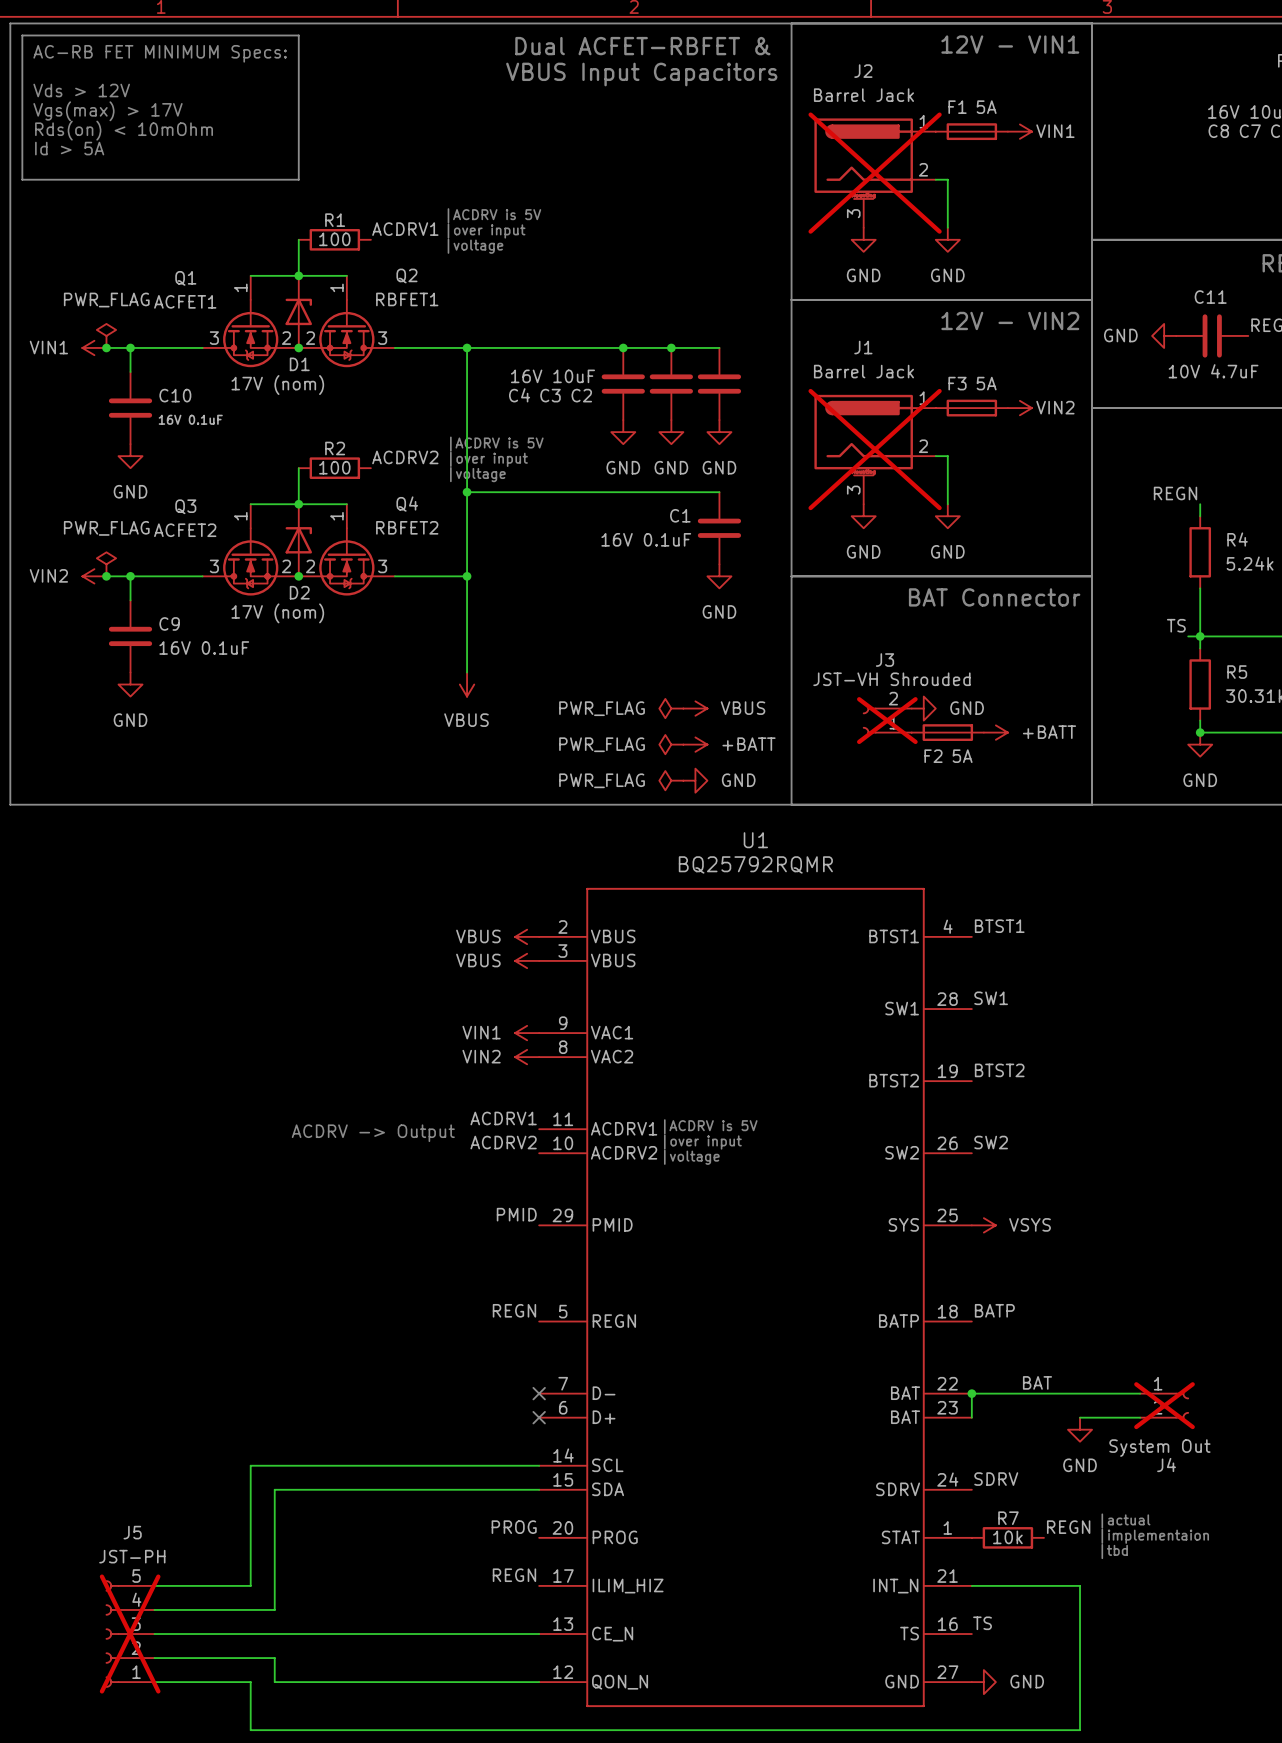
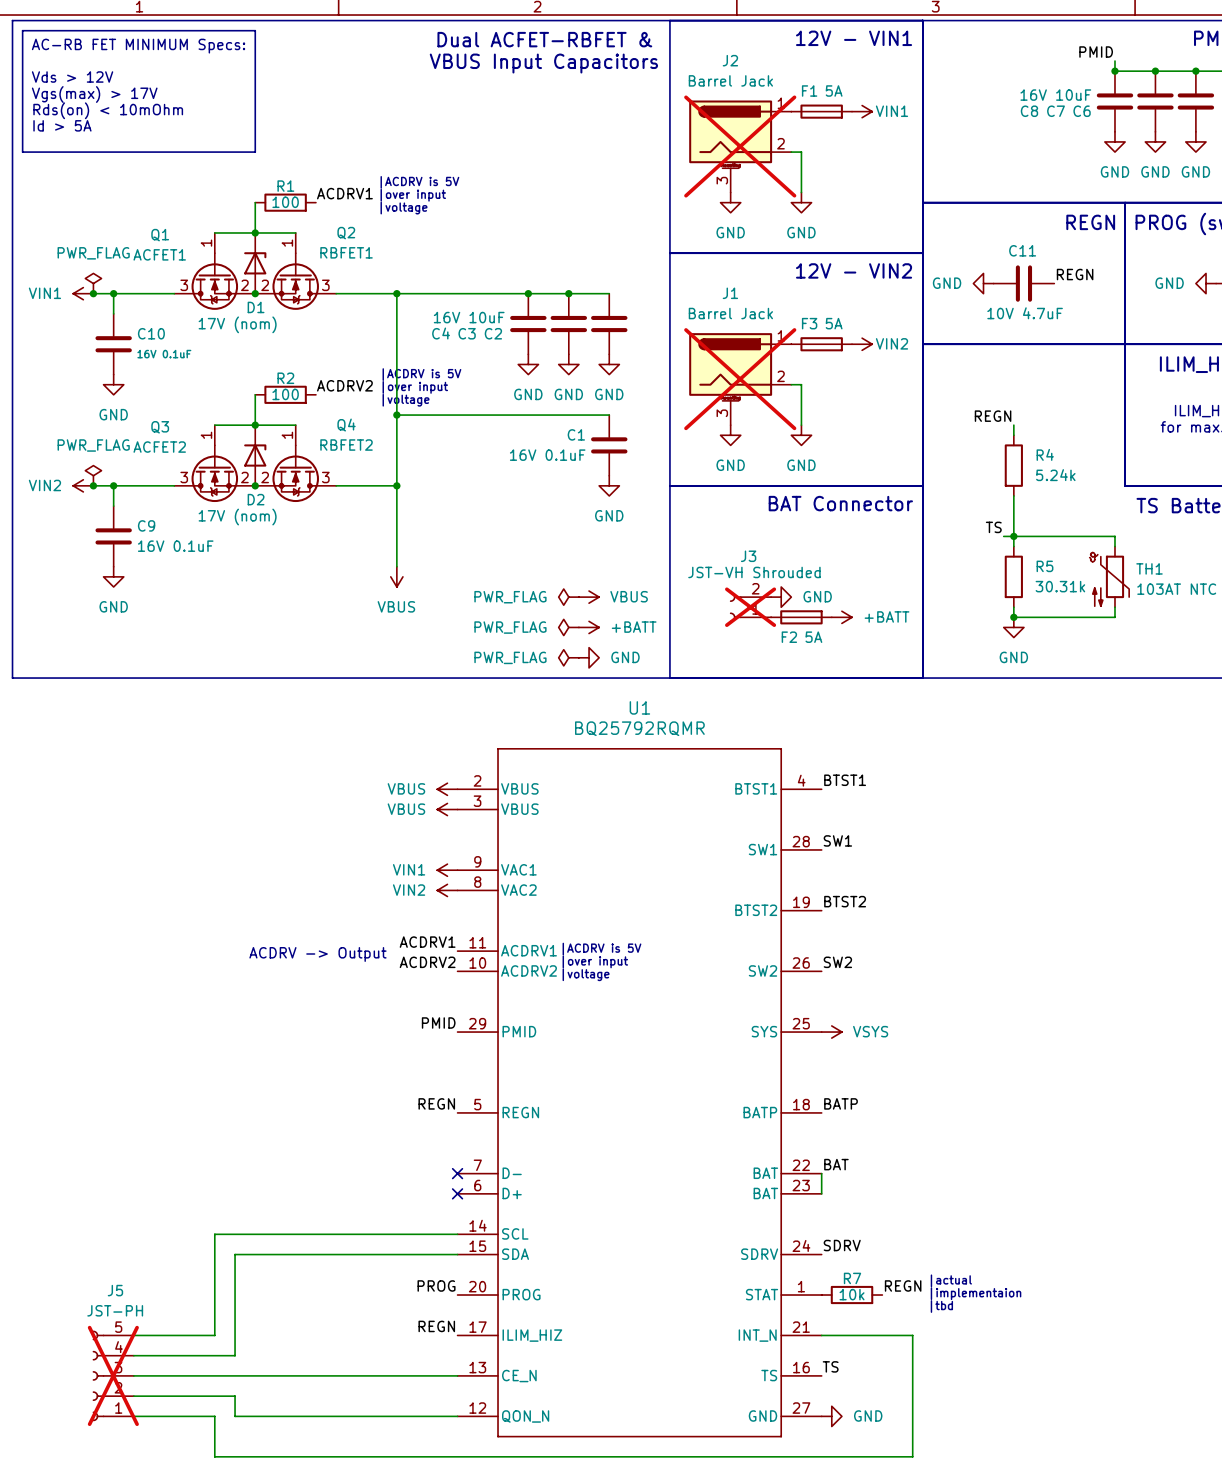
label position: BAT (1037, 1382) -> BAT (836, 1164)
wire: (971, 1393) (1140, 1393) -> none
junction: (971, 1393) -> none
J4: System Out (1164, 1405) -> none
wire: (1080, 1417) (1140, 1417) -> none
power symbol: GND (1080, 1429) -> none

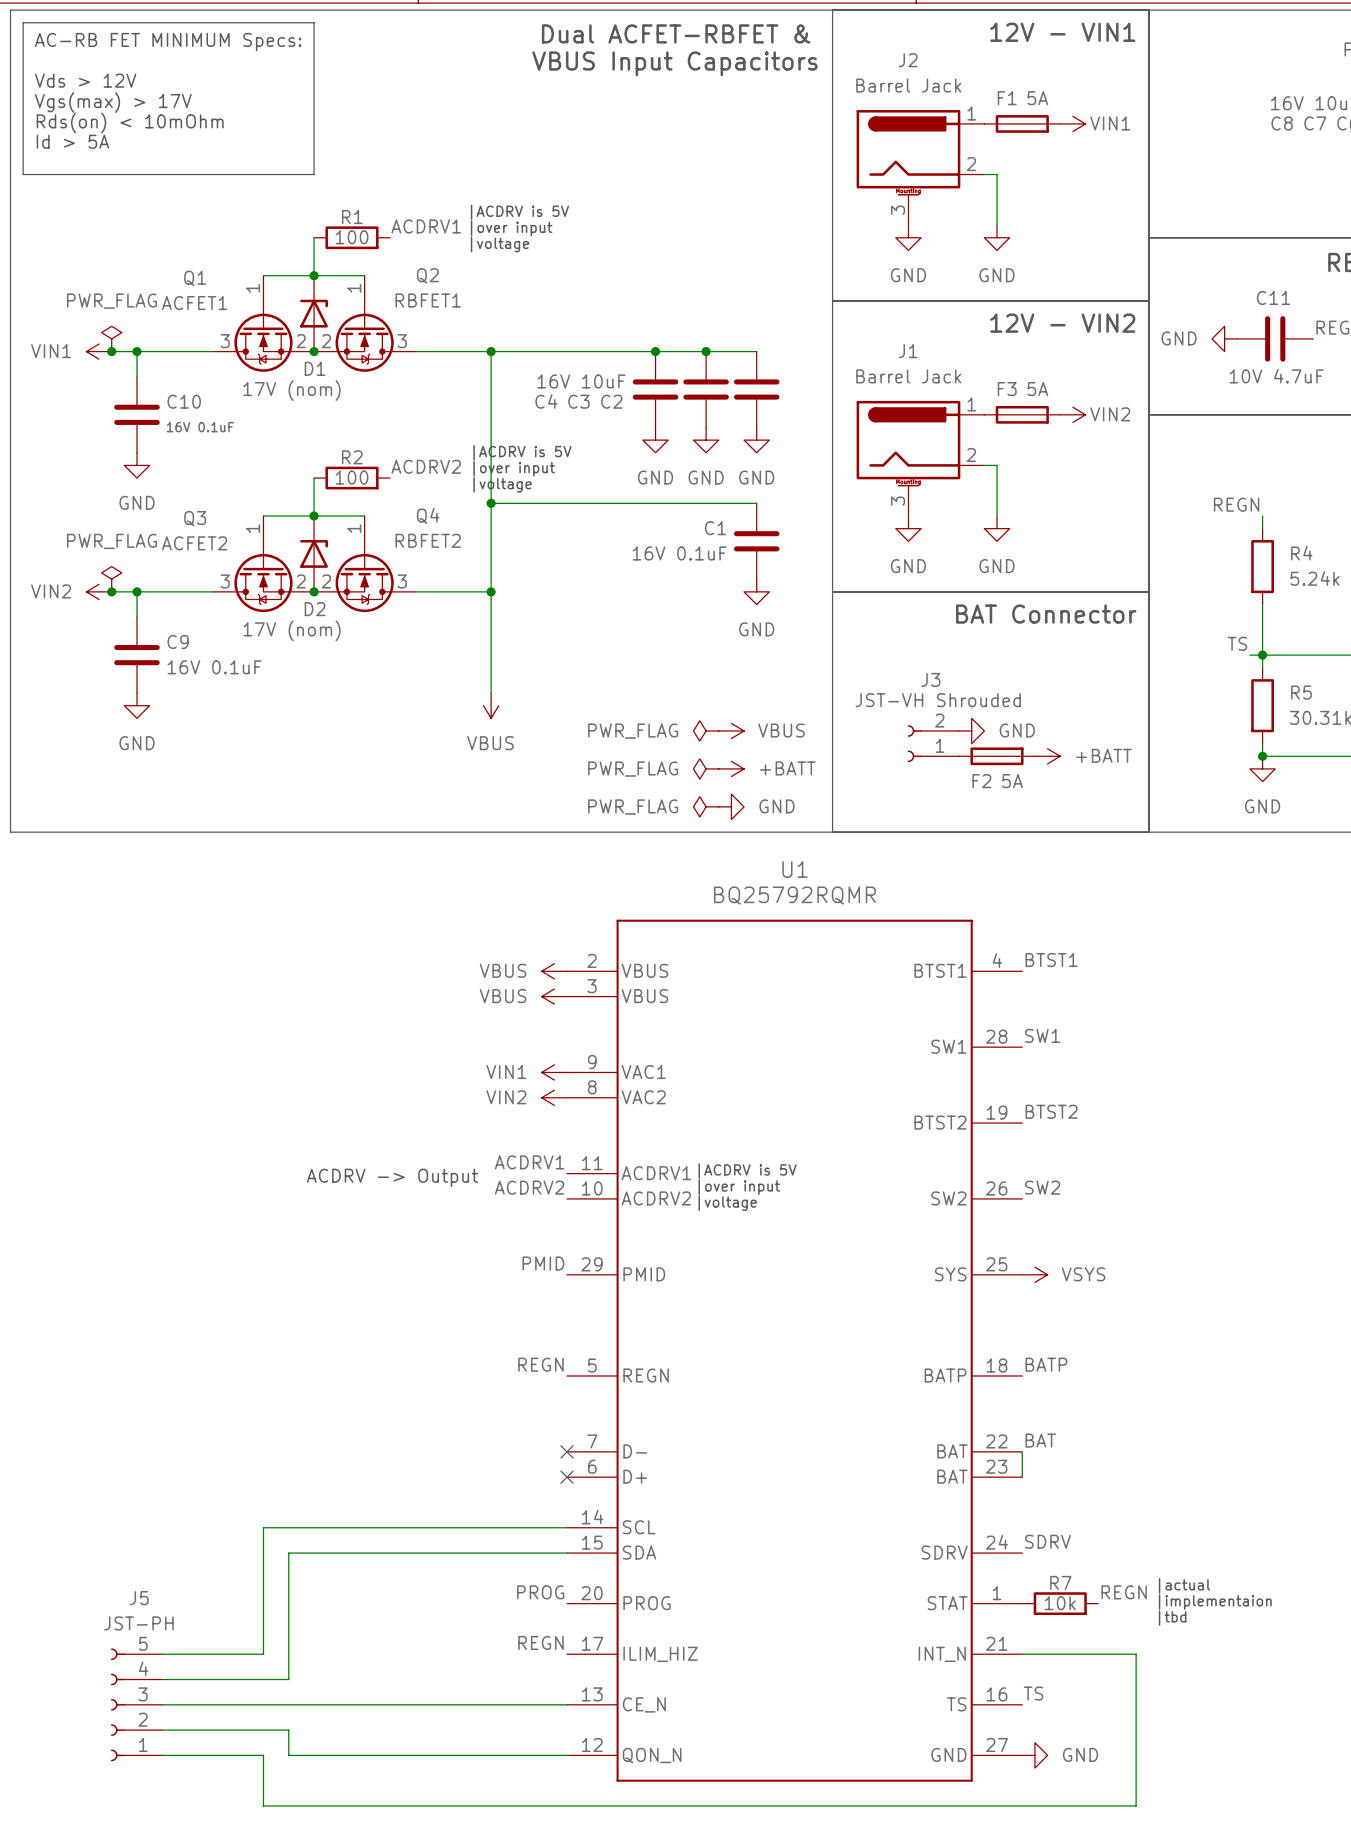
J2 do-not-place cross: (740, 146) -> none
J1 do-not-place cross: (740, 379) -> none
J3 do-not-place cross: (750, 607) -> none
J5 do-not-place cross: (113, 1375) -> none

